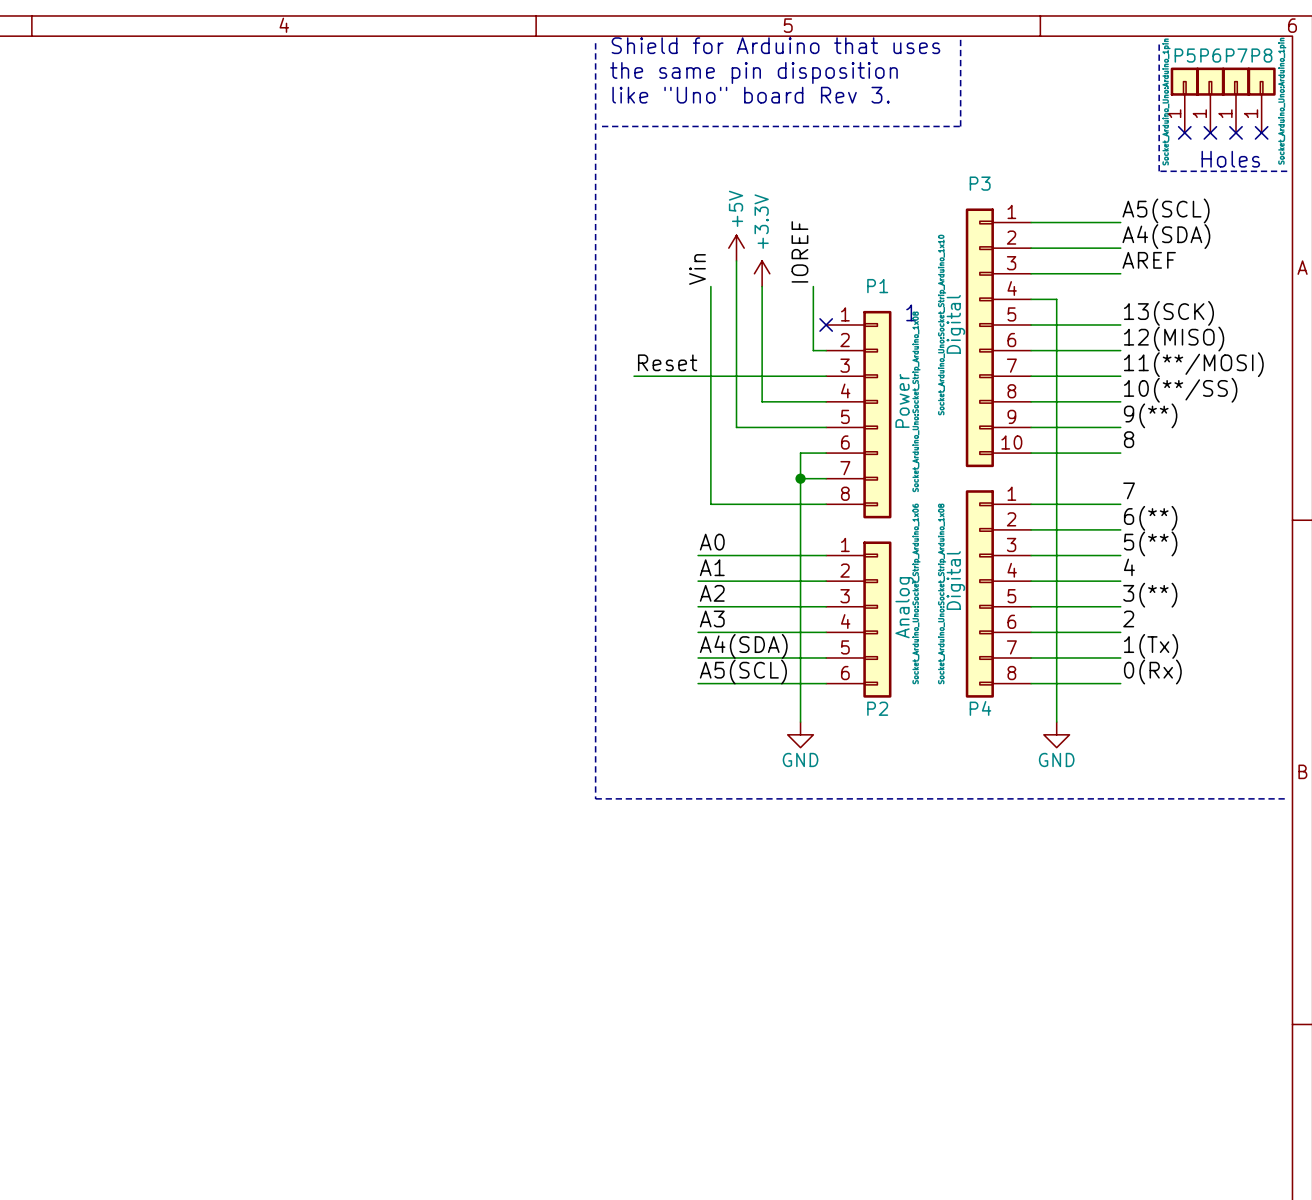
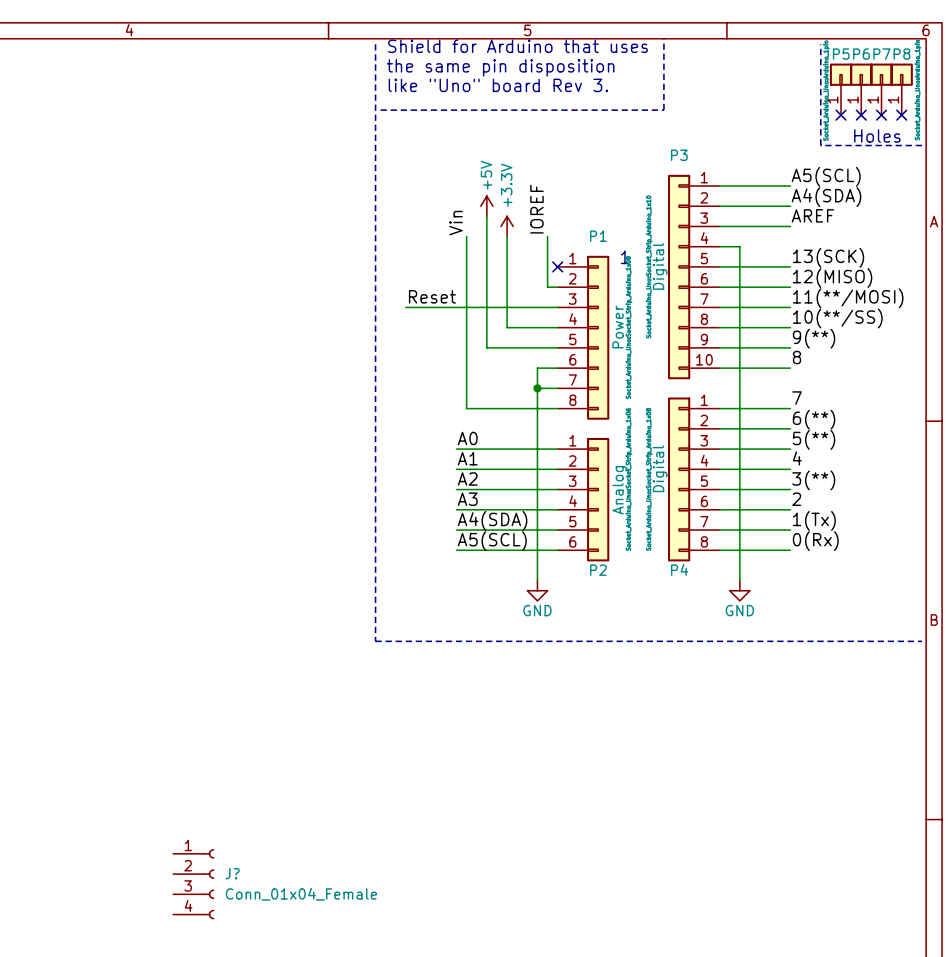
J?: none -> Conn_01x04_Female (193, 884)

